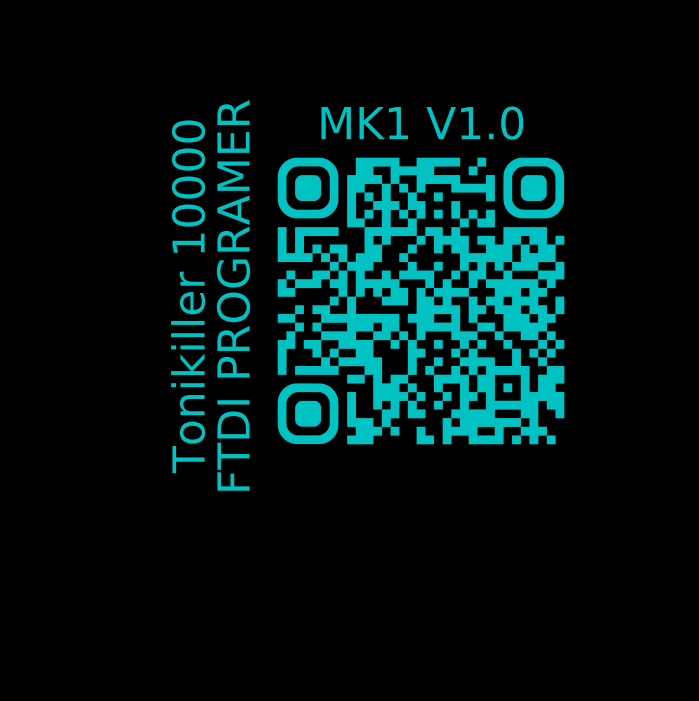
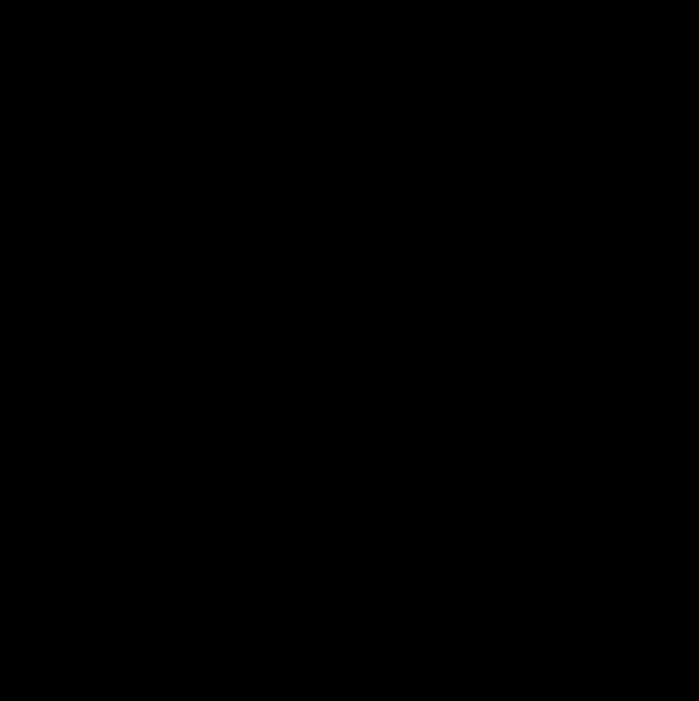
text: MK1 V1.0 (422, 123) -> none
drawing: [277, 157, 565, 445] -> none
text: FTDI PROGRAMER (233, 295) -> none
text: Tonikiller 10000 (188, 296) -> none

